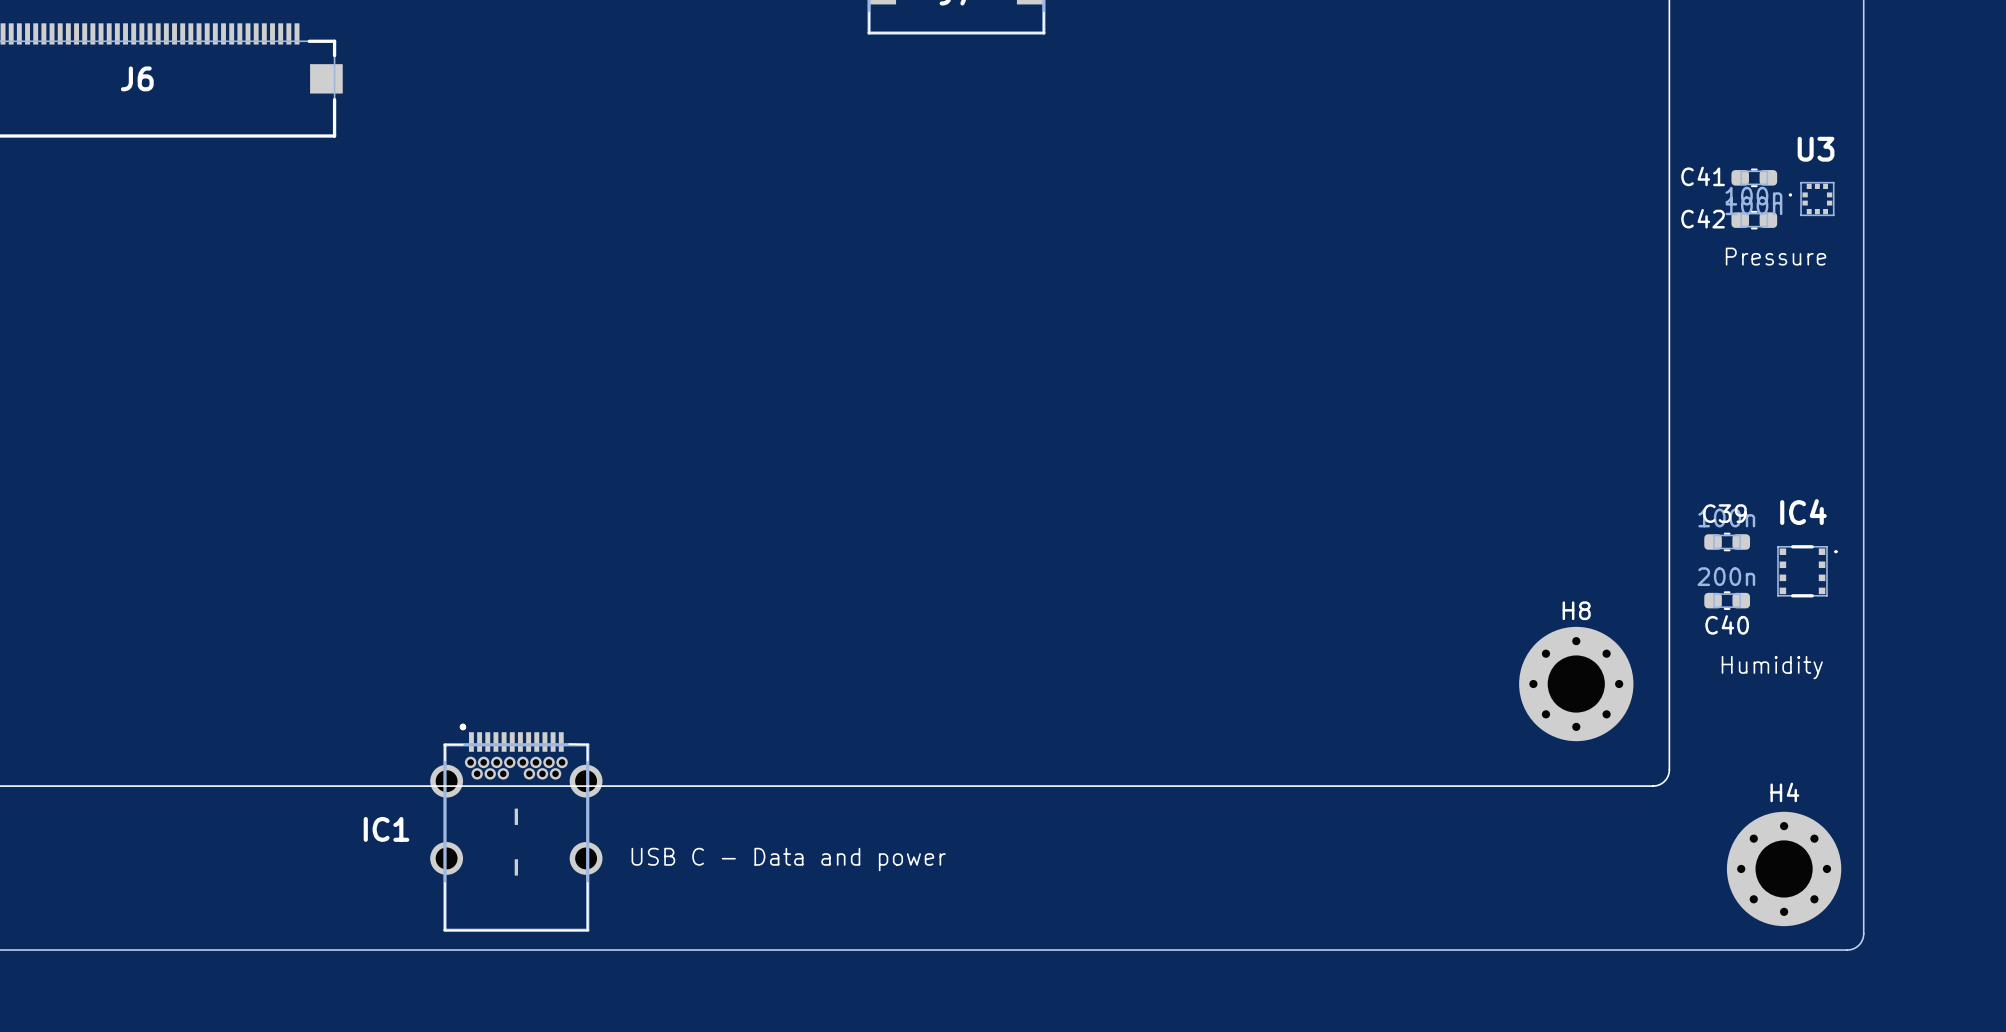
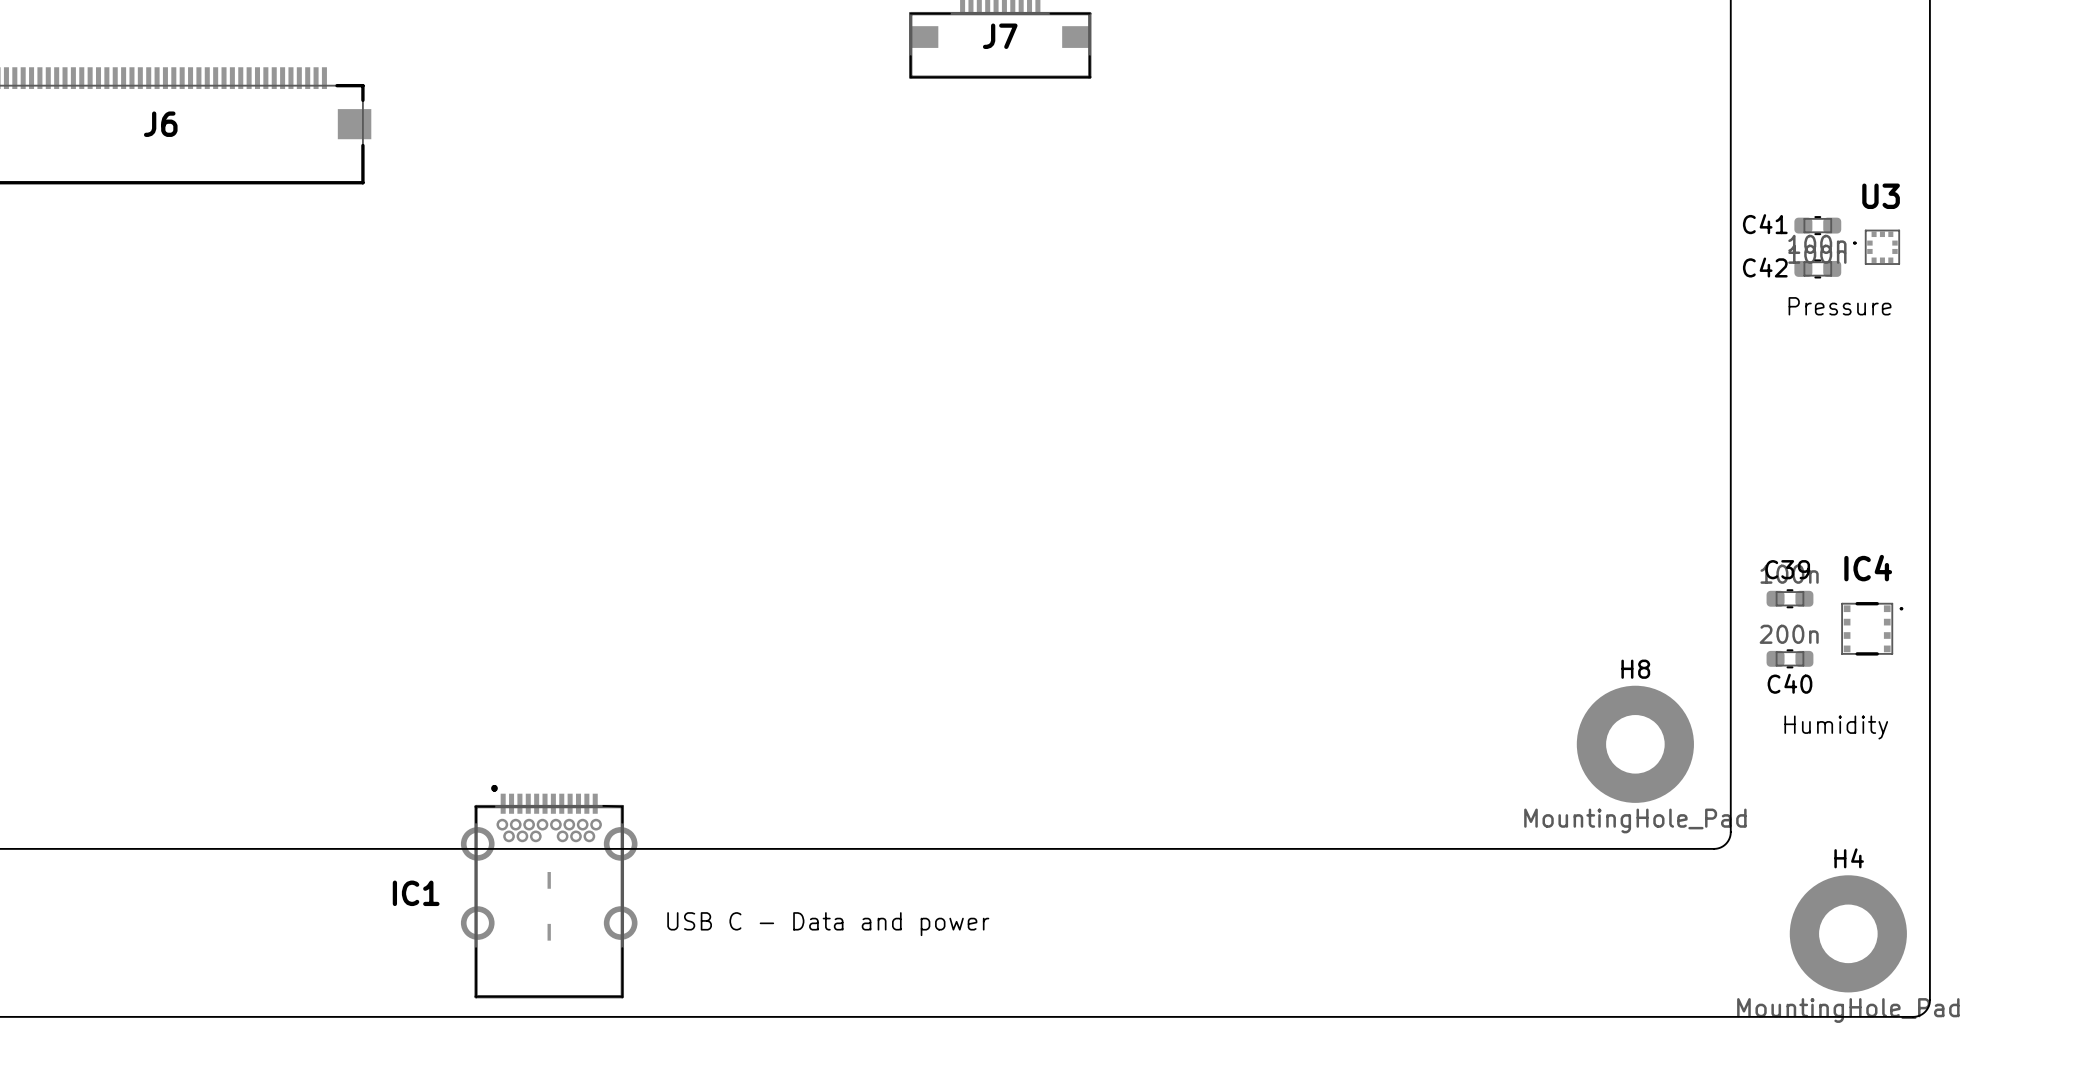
H8 footprint: [1519, 626, 1634, 742] -> [1576, 685, 1694, 803]
H8 value: none -> MountingHole_Pad (1635, 820)
H4 footprint: [1726, 811, 1842, 927] -> [1789, 875, 1907, 993]
H4 value: none -> MountingHole_Pad (1848, 1010)

